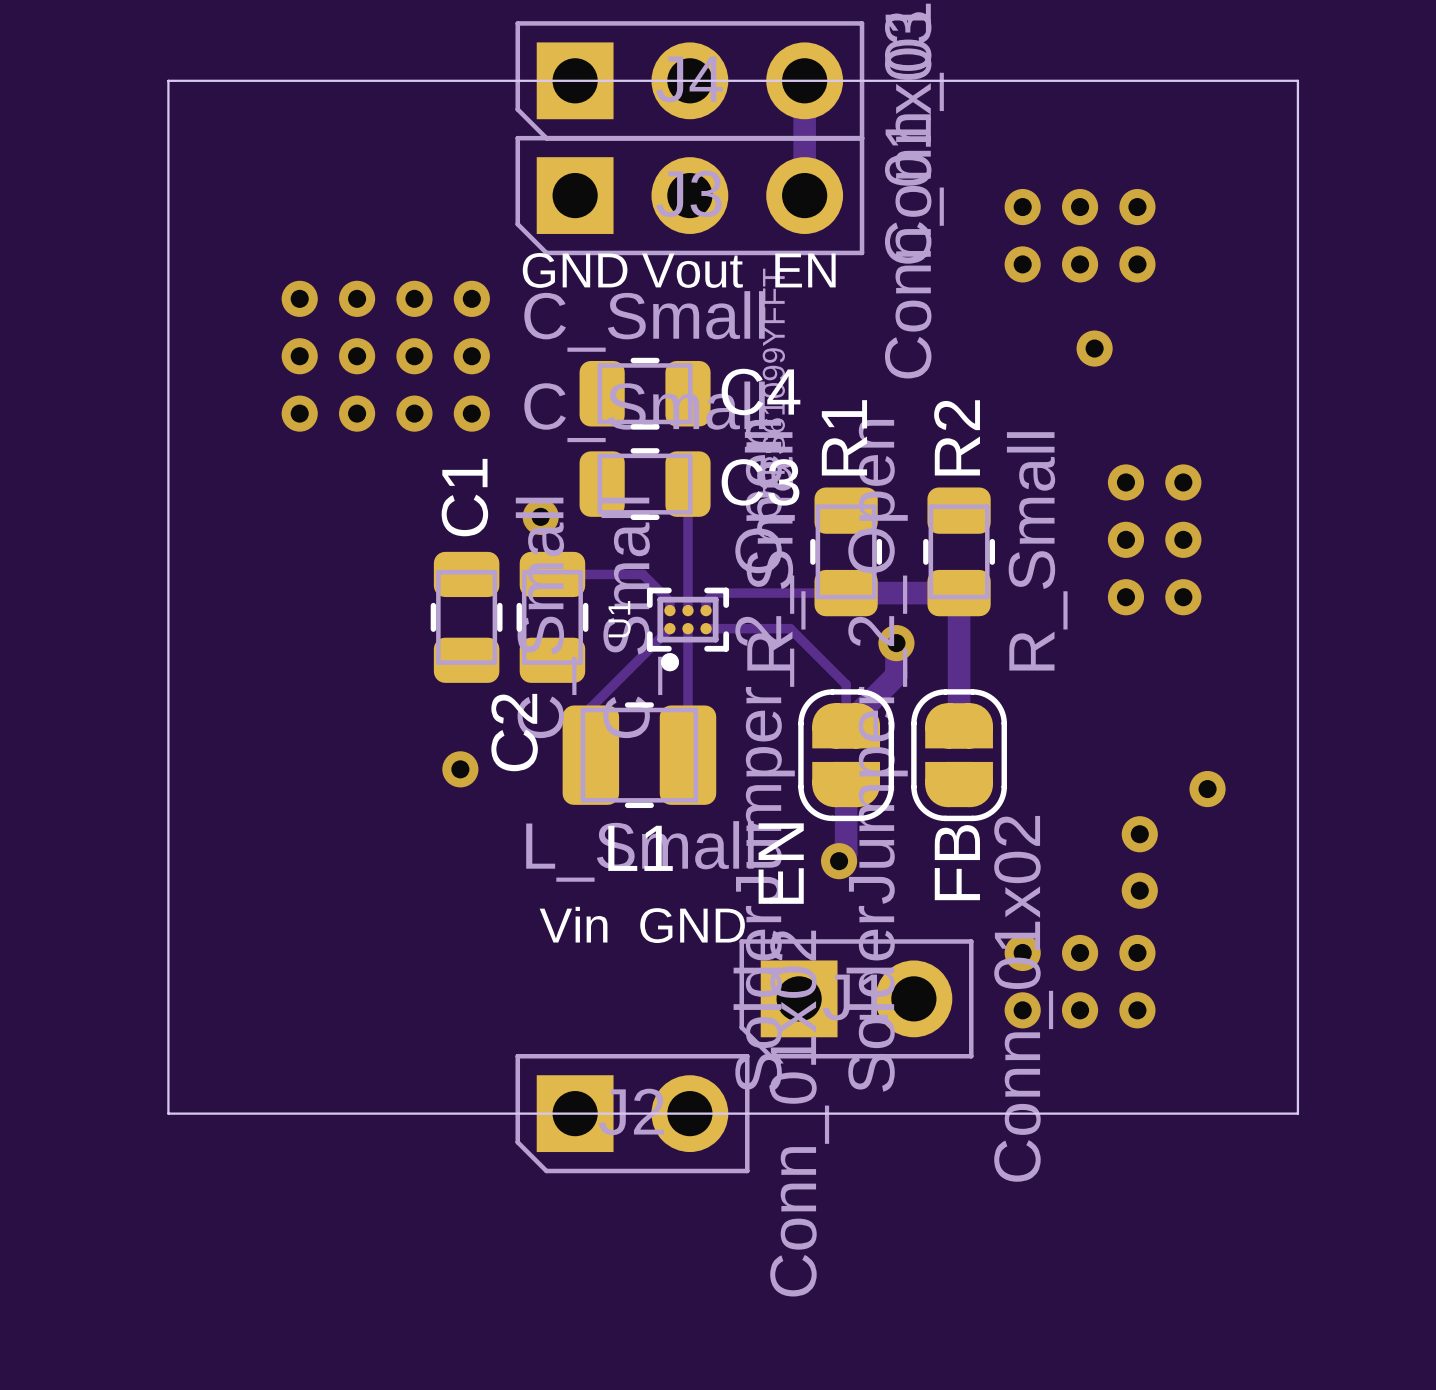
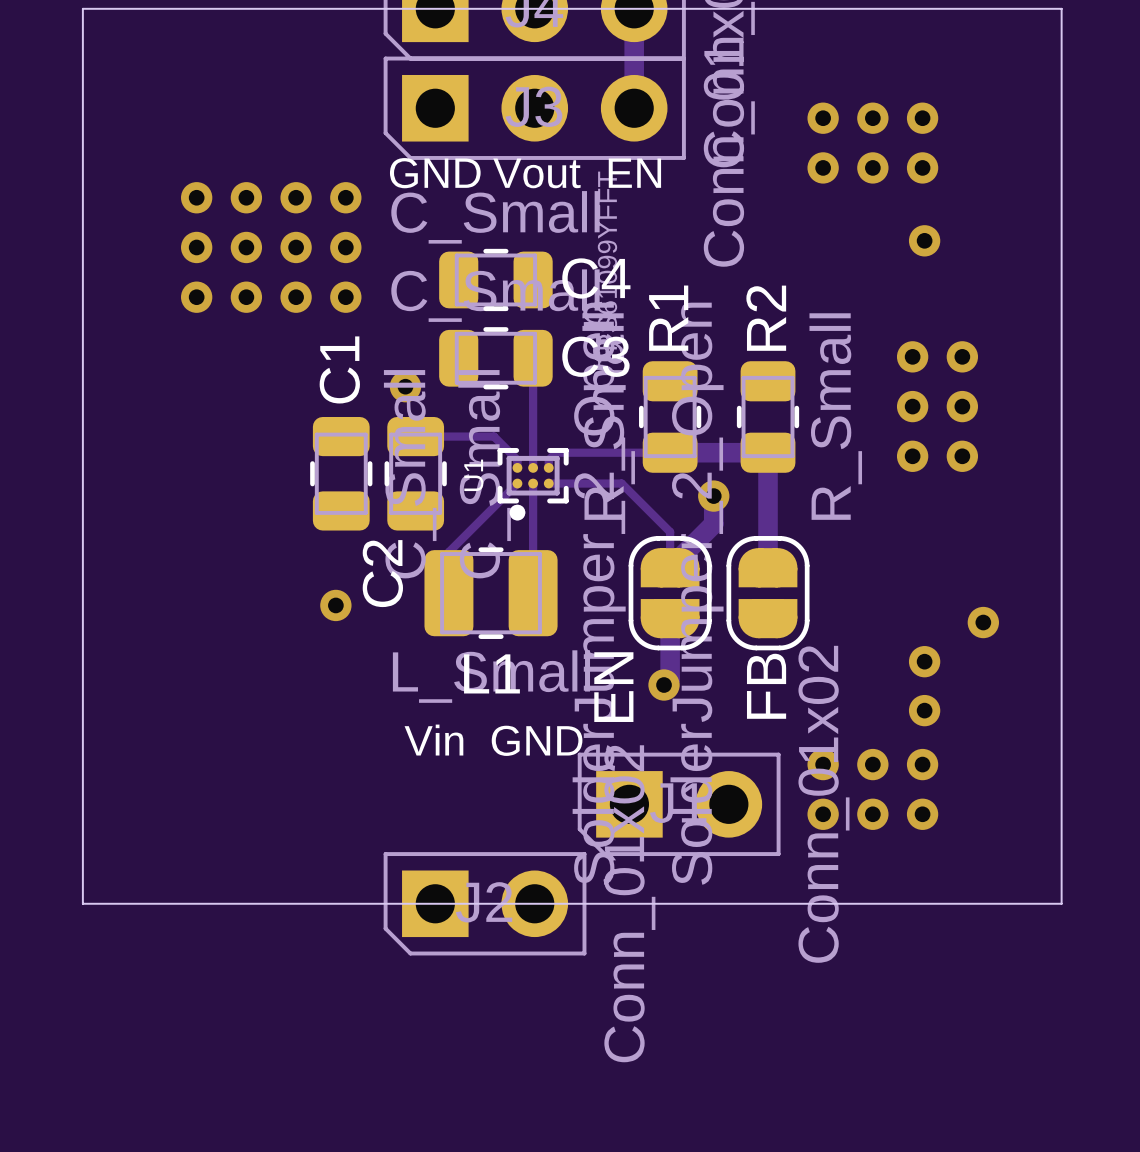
via position: (1094, 348) -> (924, 240)

